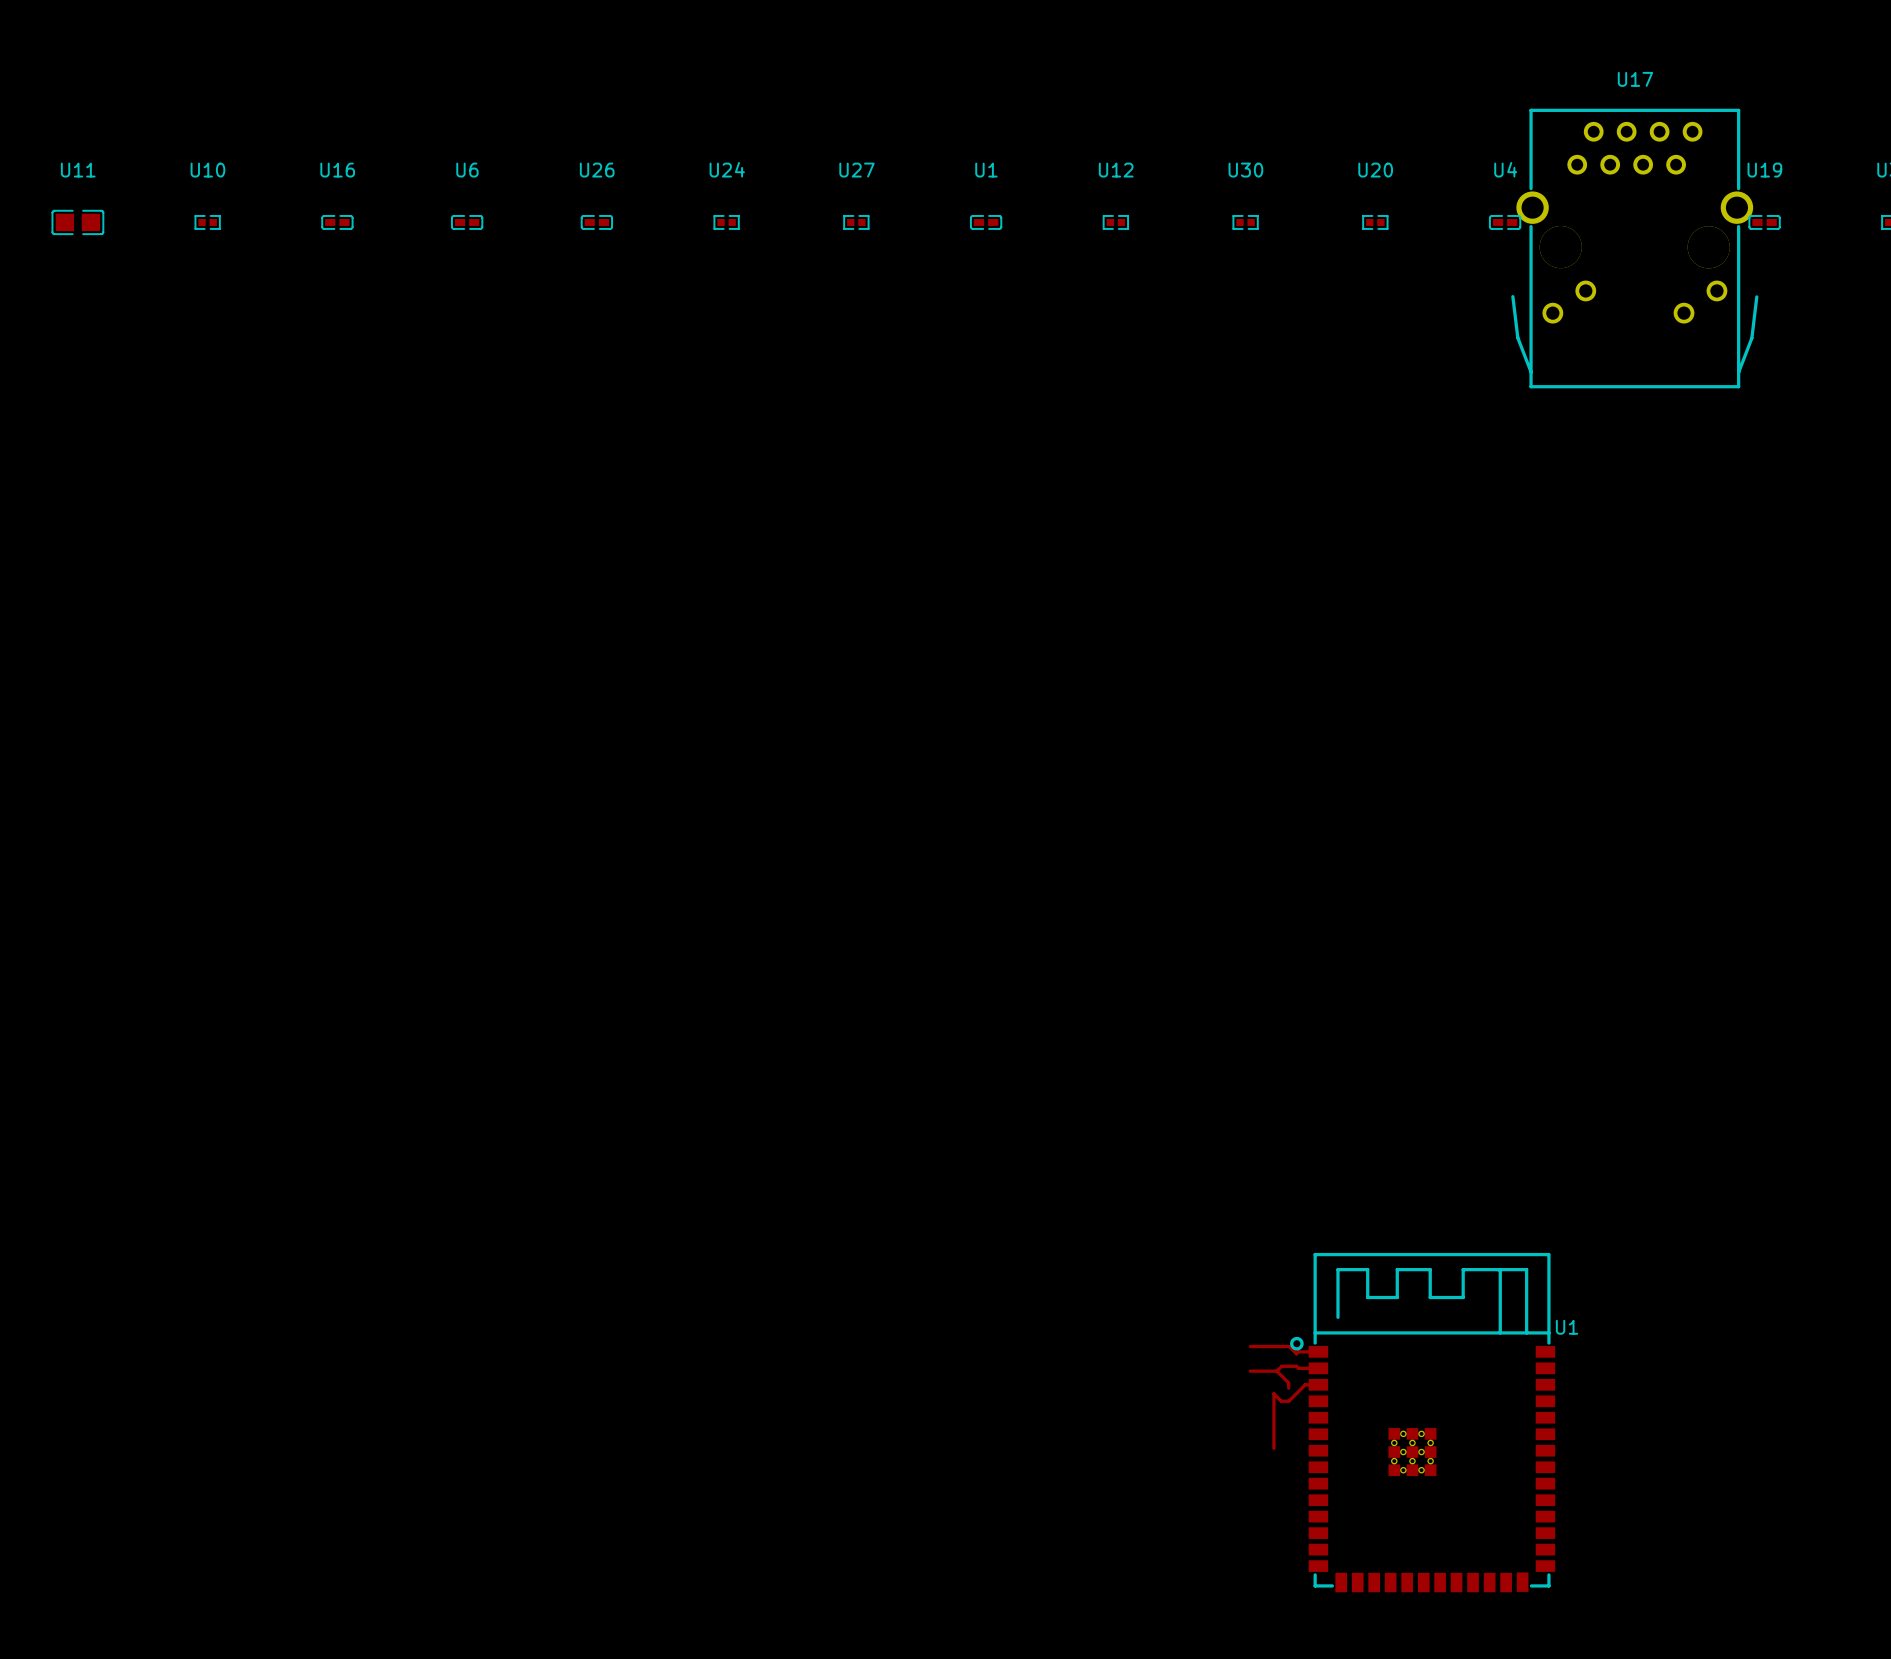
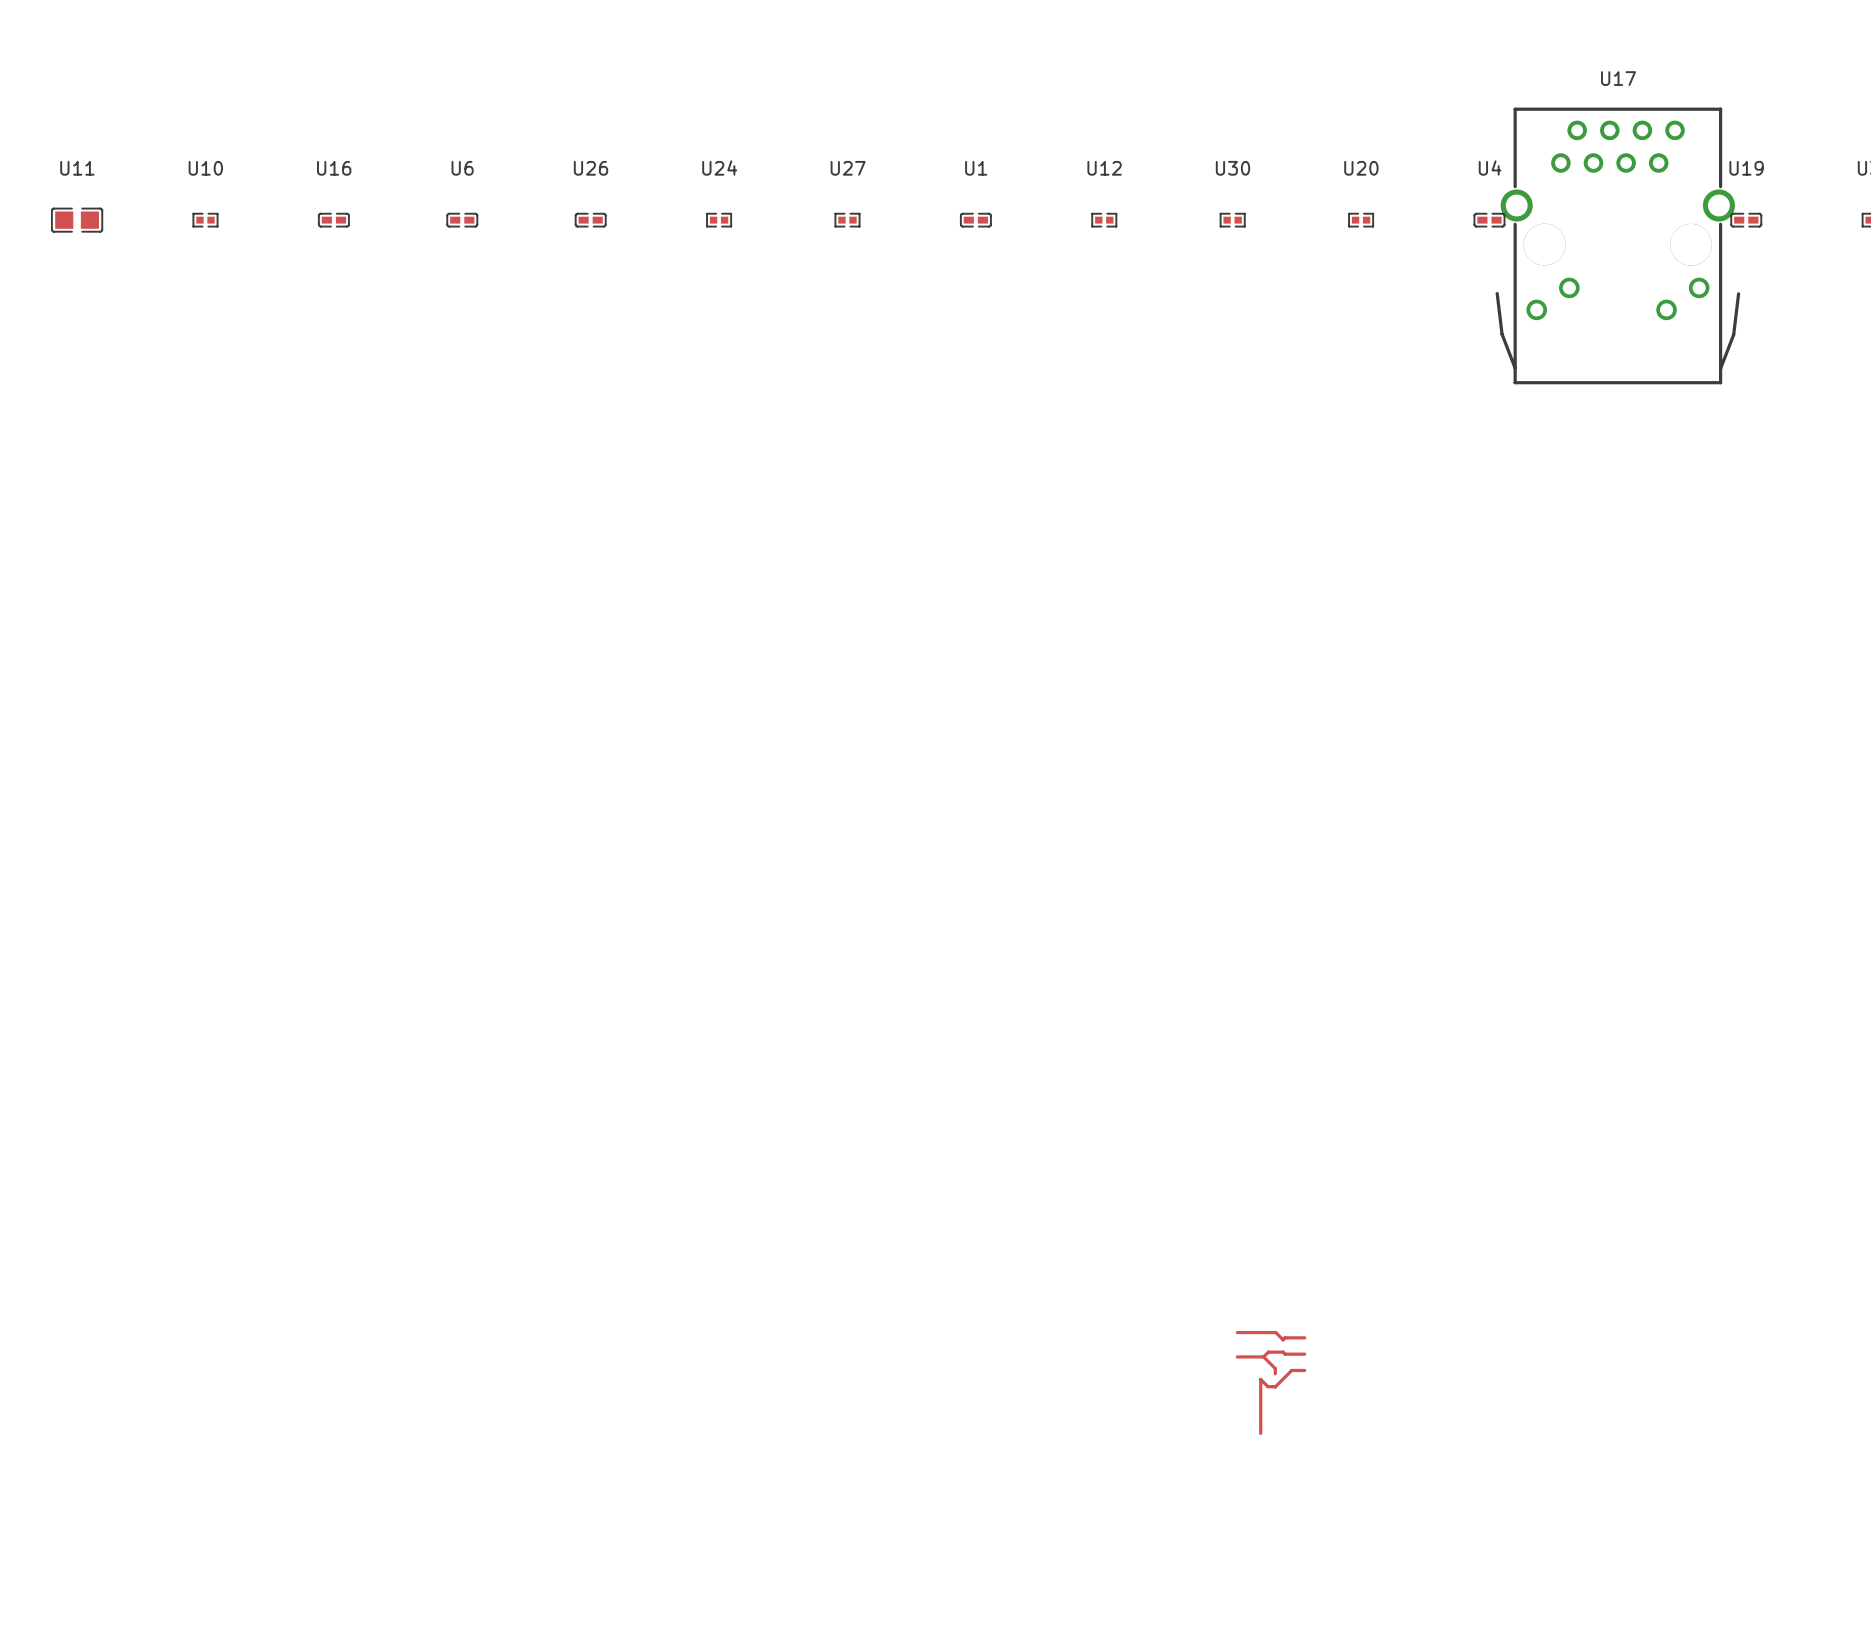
U1: (1422, 1422) -> none

